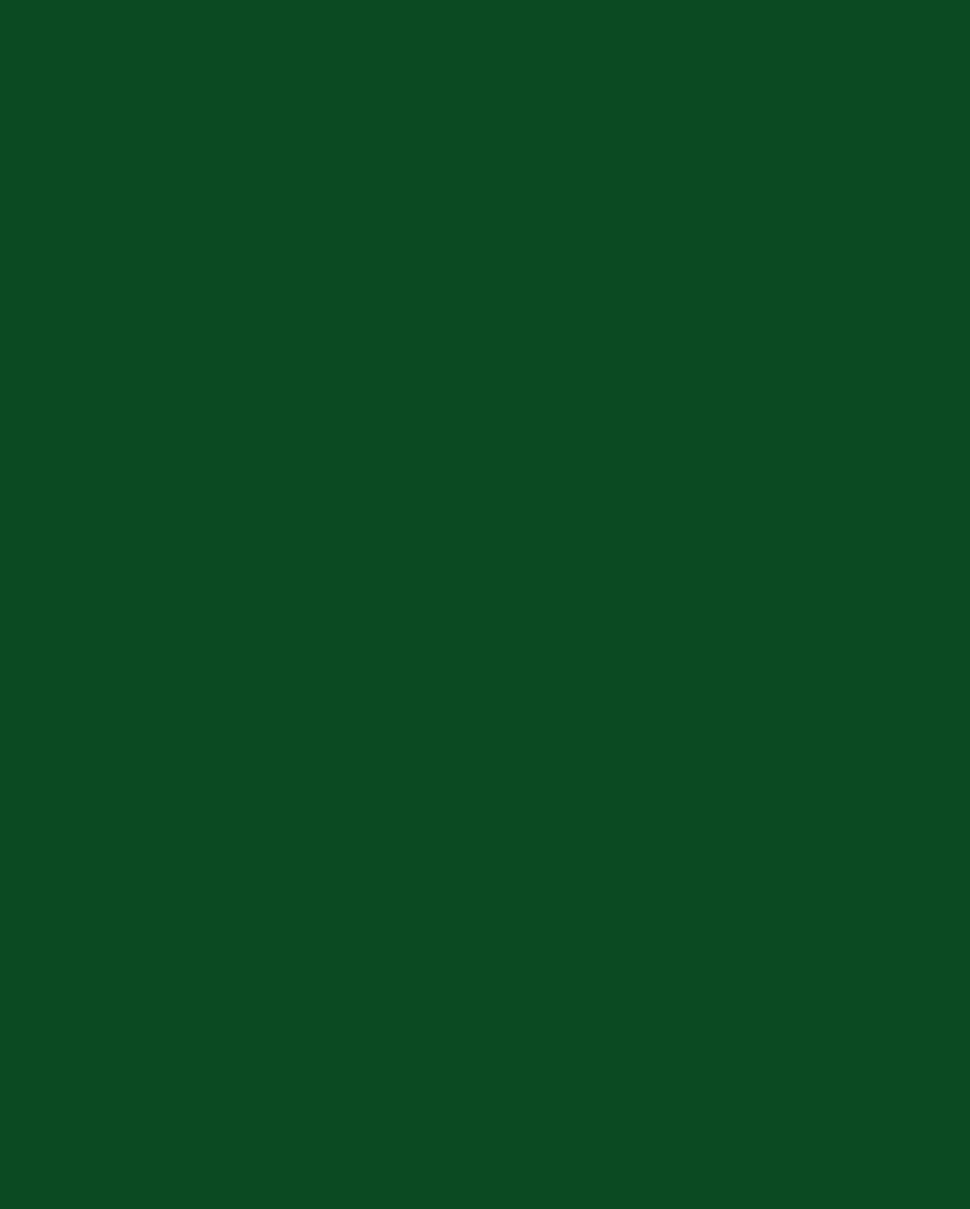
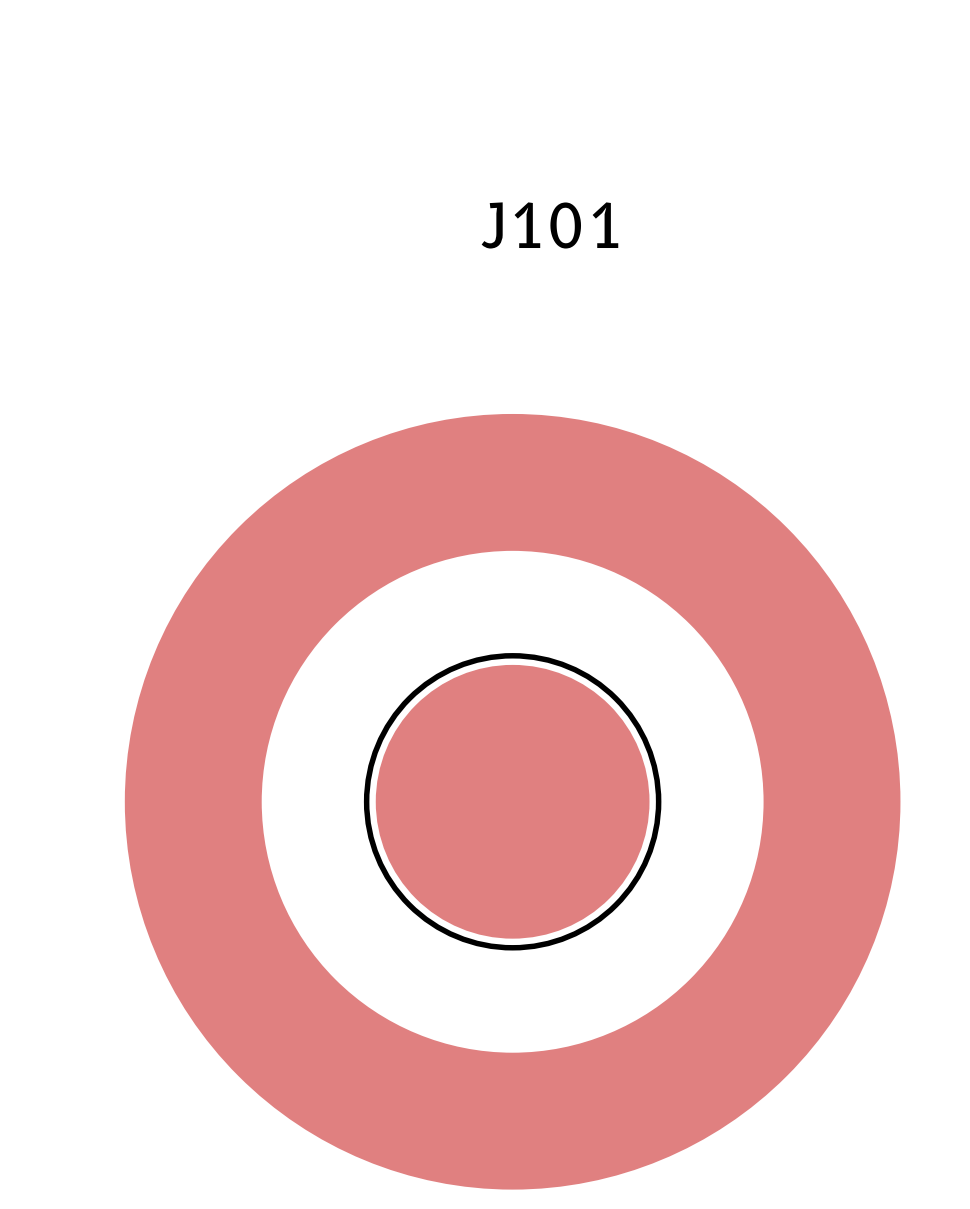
J101: none -> (512, 801)

